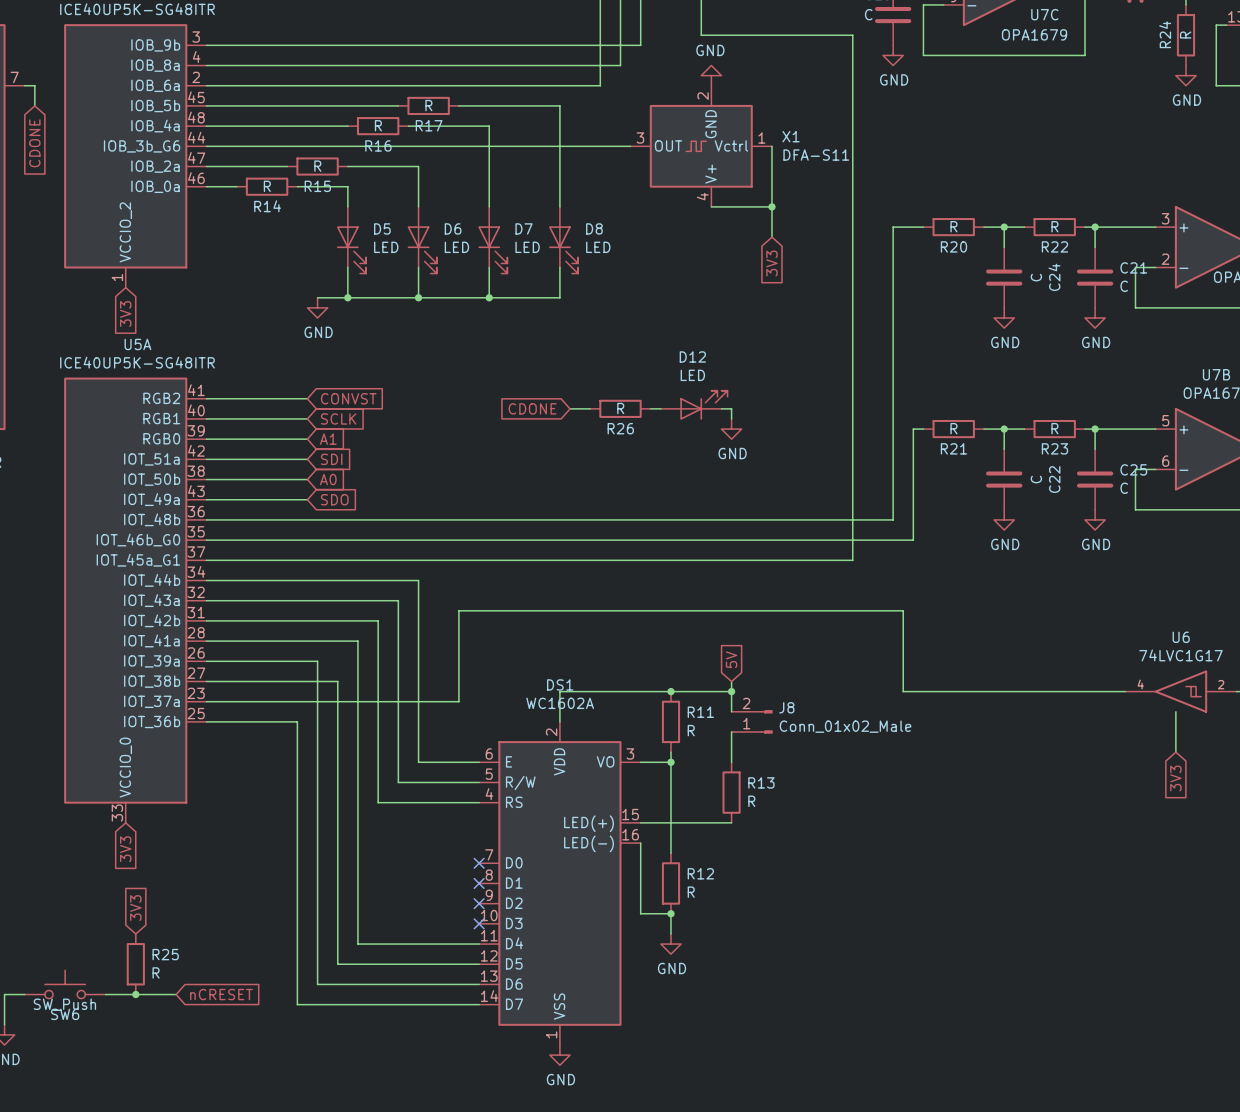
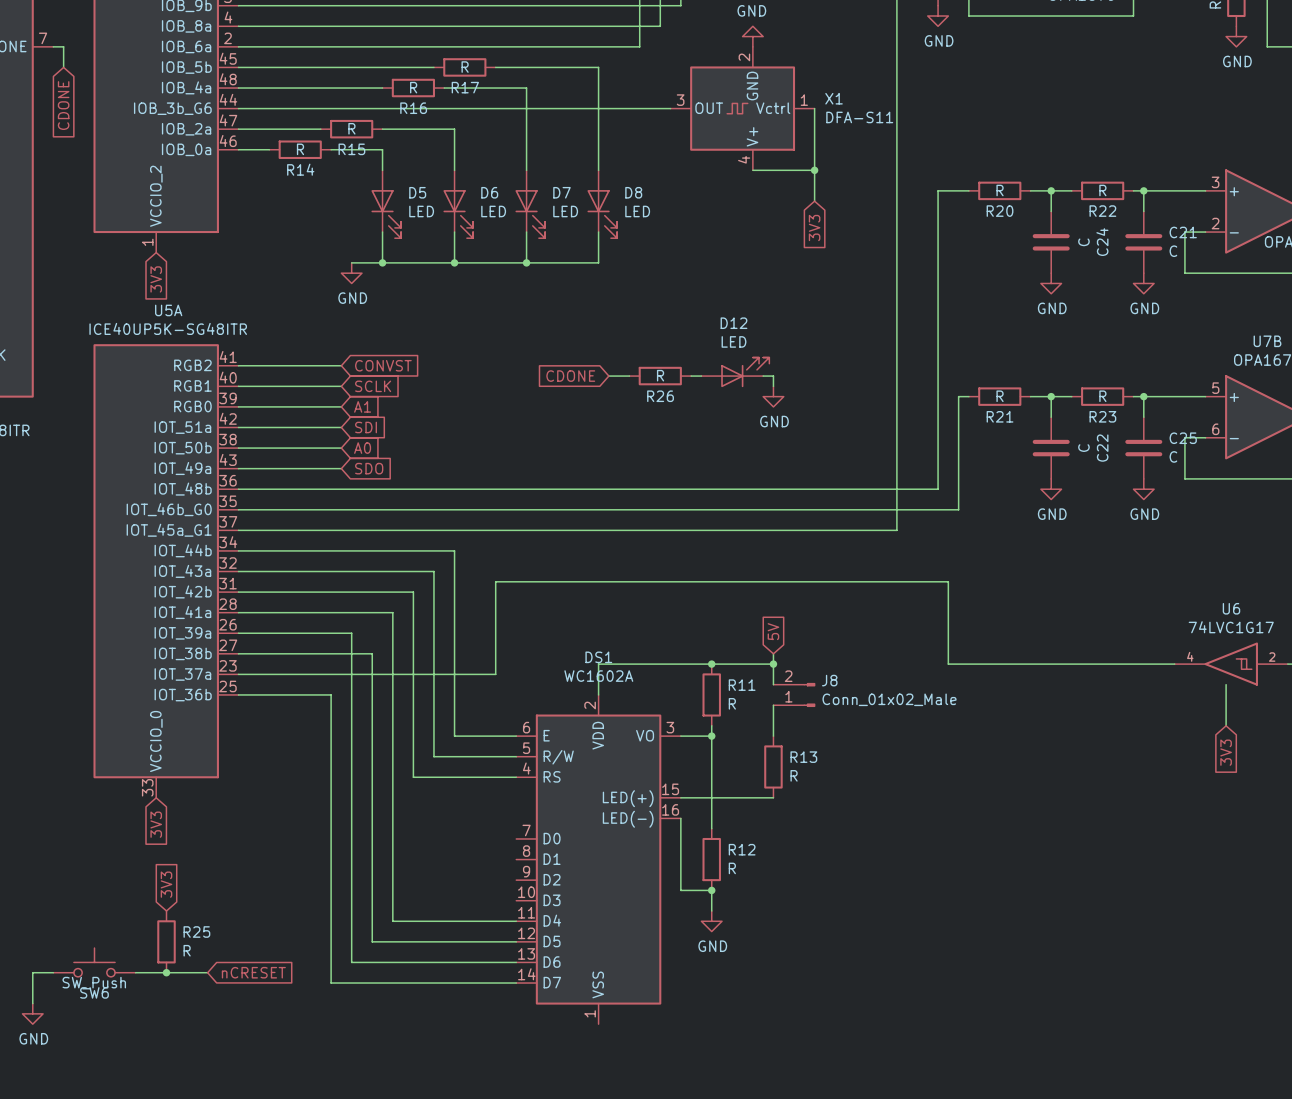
no-connect mark: (479, 863) -> none
no-connect mark: (479, 883) -> none
no-connect mark: (479, 903) -> none
no-connect mark: (479, 923) -> none
power symbol: GND (559, 1055) -> none

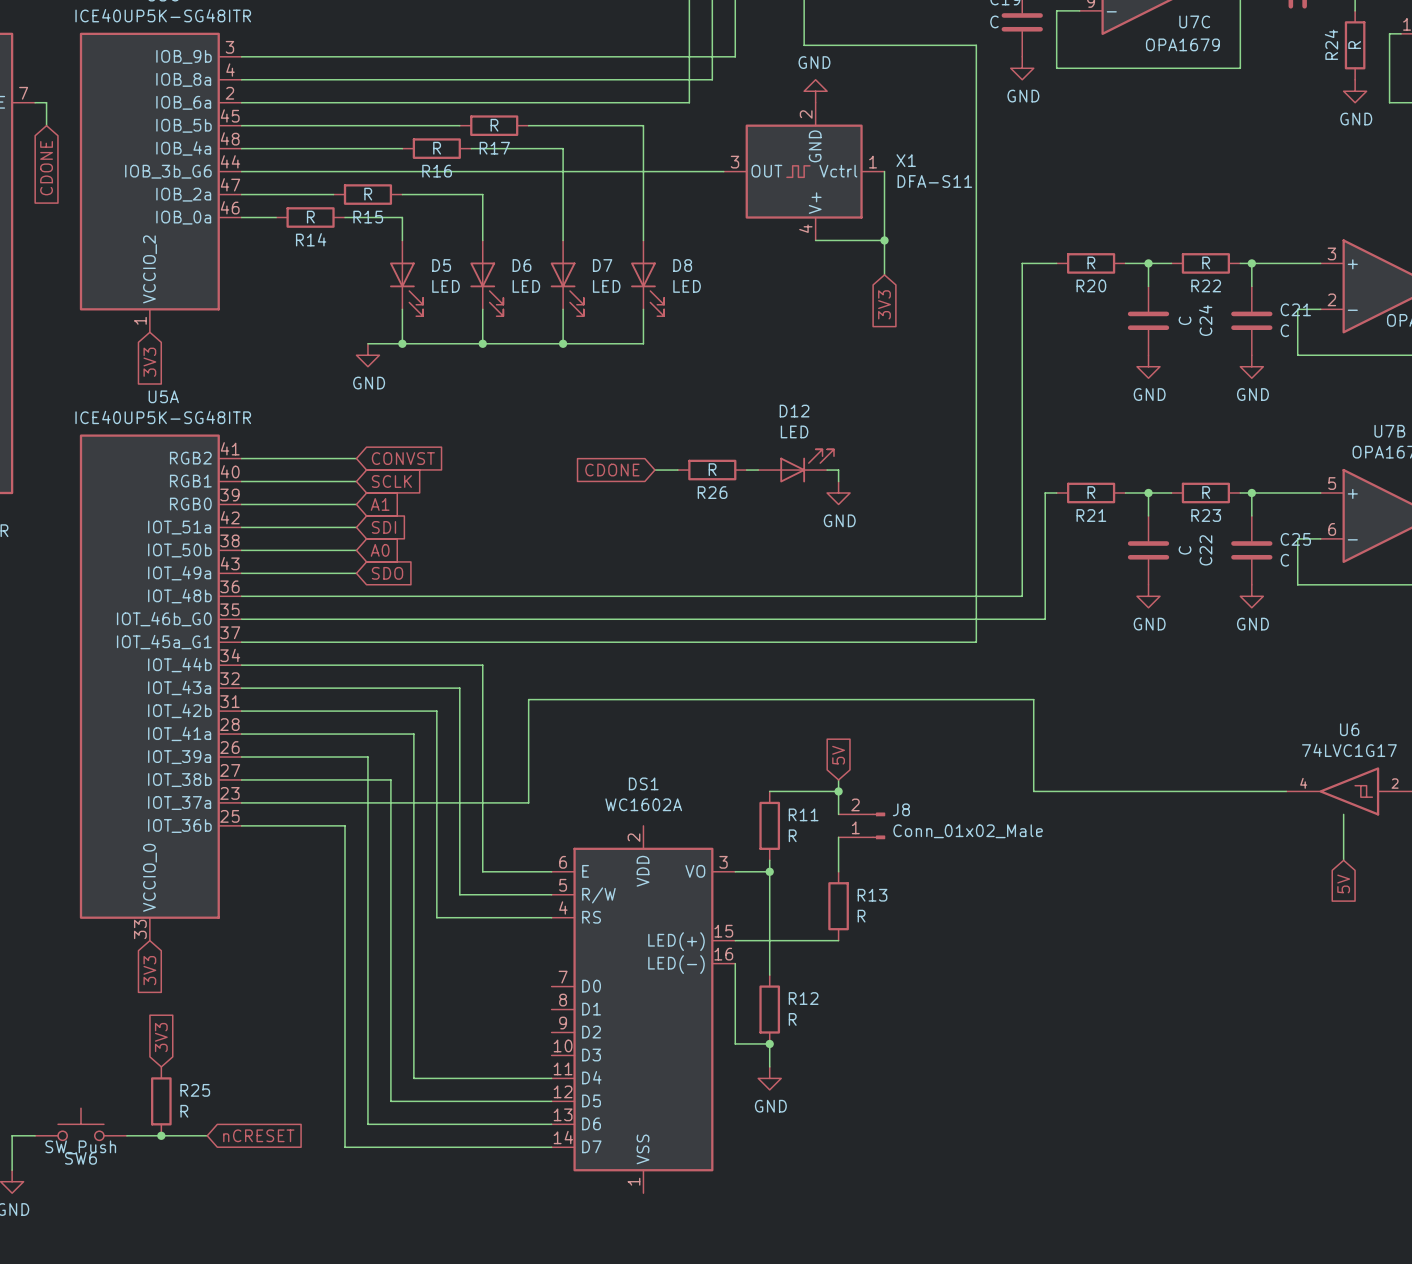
wire: (711, 664) (598, 664) (598, 694) -> none
junction: (711, 664) -> none
global label: 3V3 (1226, 752) -> 5V (1343, 883)

